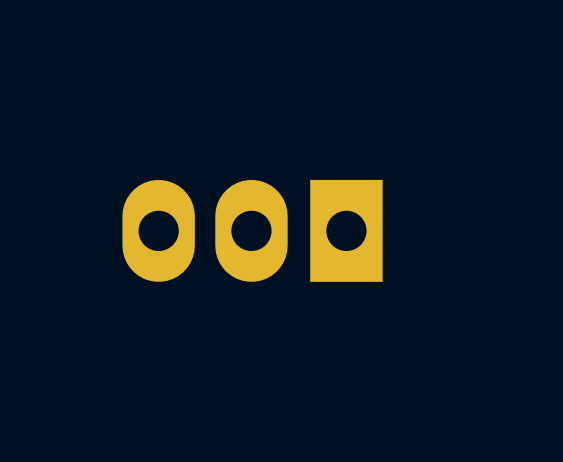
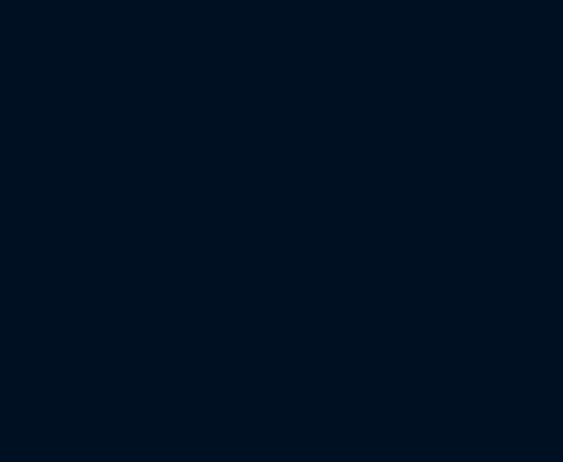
part: (252, 230) -> none

